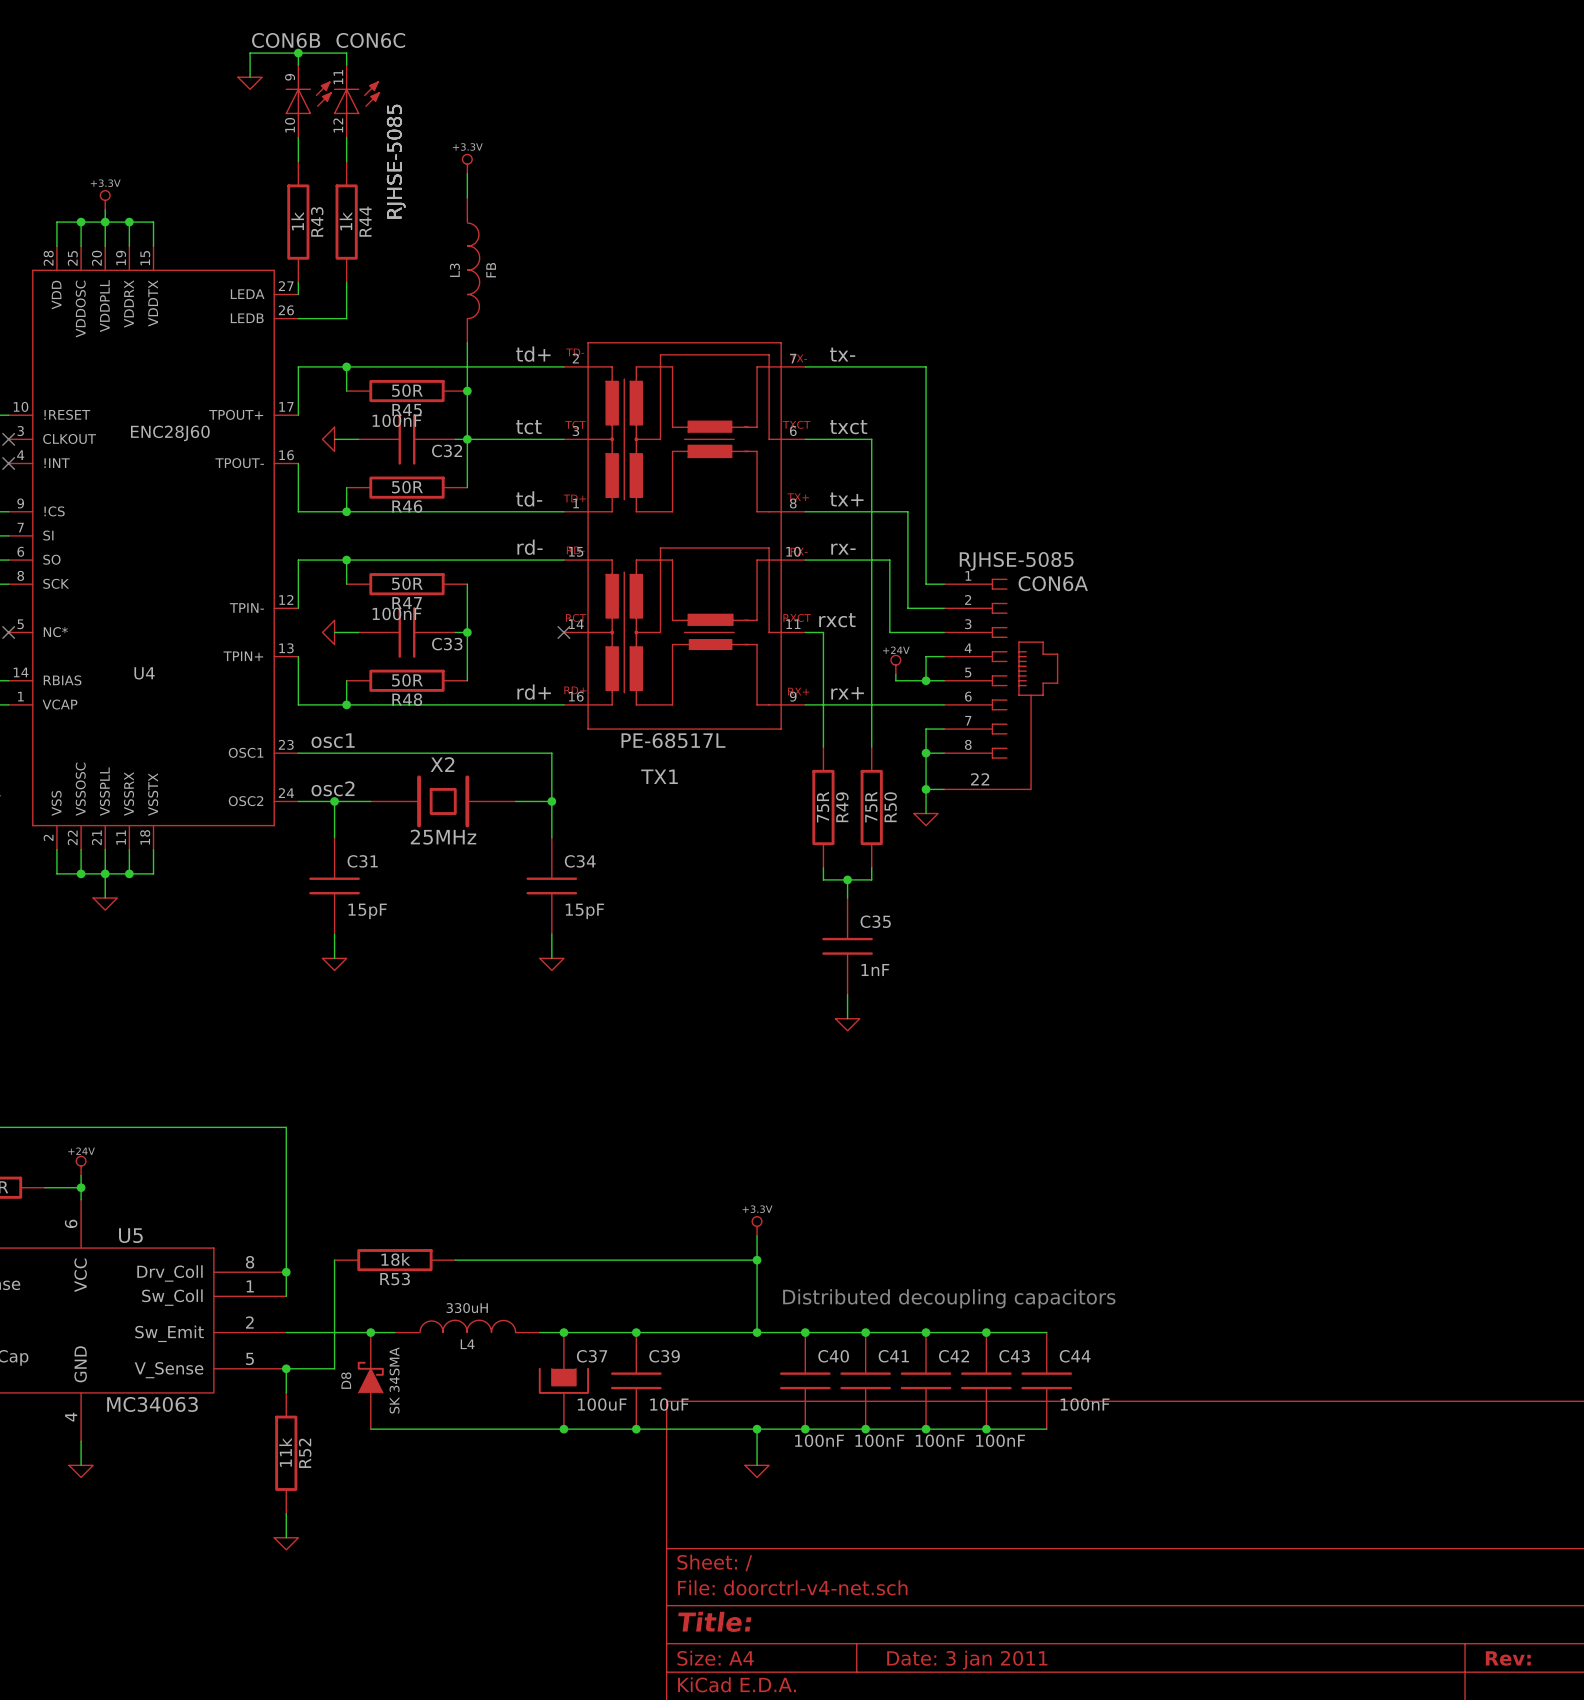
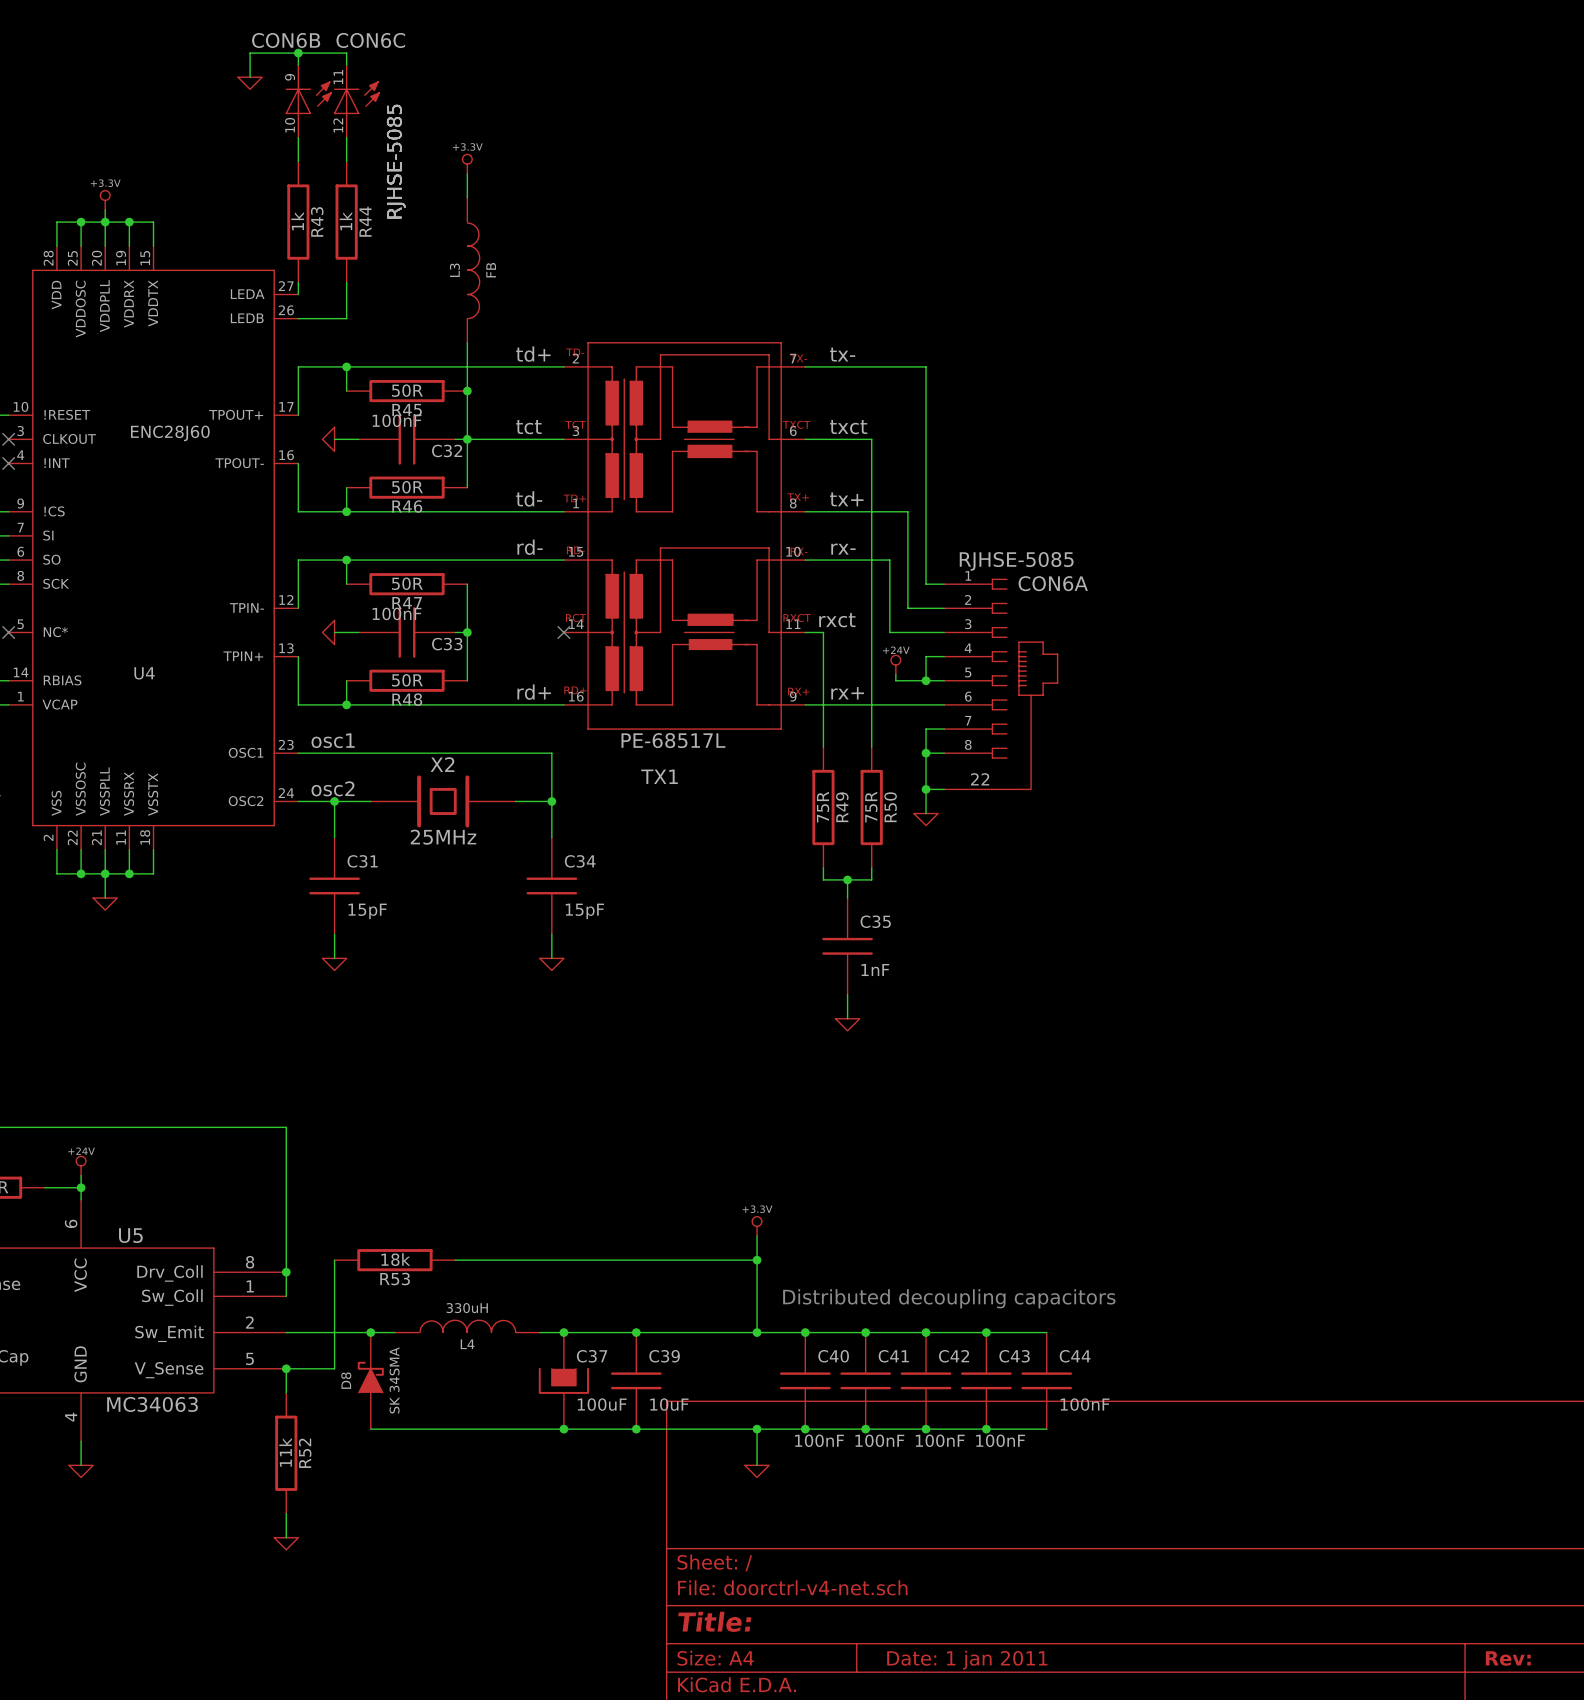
title block: Date: 3 jan 2011 (967, 1660) -> Date: 1 jan 2011 (967, 1660)

